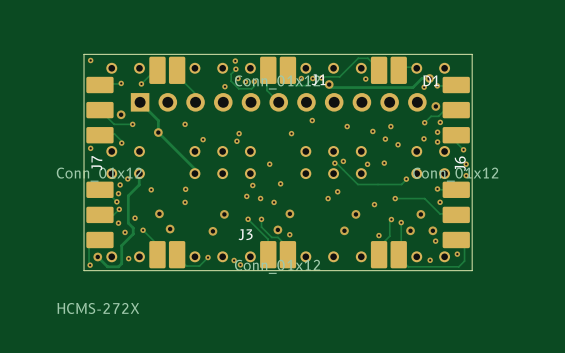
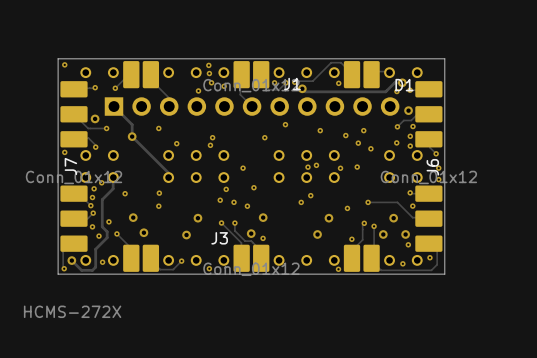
track: (235, 69) (231, 74) (231, 81) (238, 88) (251, 88) (254, 86) (254, 81) -> none
via: (245, 81) -> none
via: (254, 81) -> none
via: none -> (224, 86)
track: (334, 163) (357, 184) (401, 184) (406, 179) -> none
via: (406, 179) -> none
via: (234, 260) -> none
via: (240, 264) -> none
via: none -> (209, 268)
via: none -> (338, 269)

